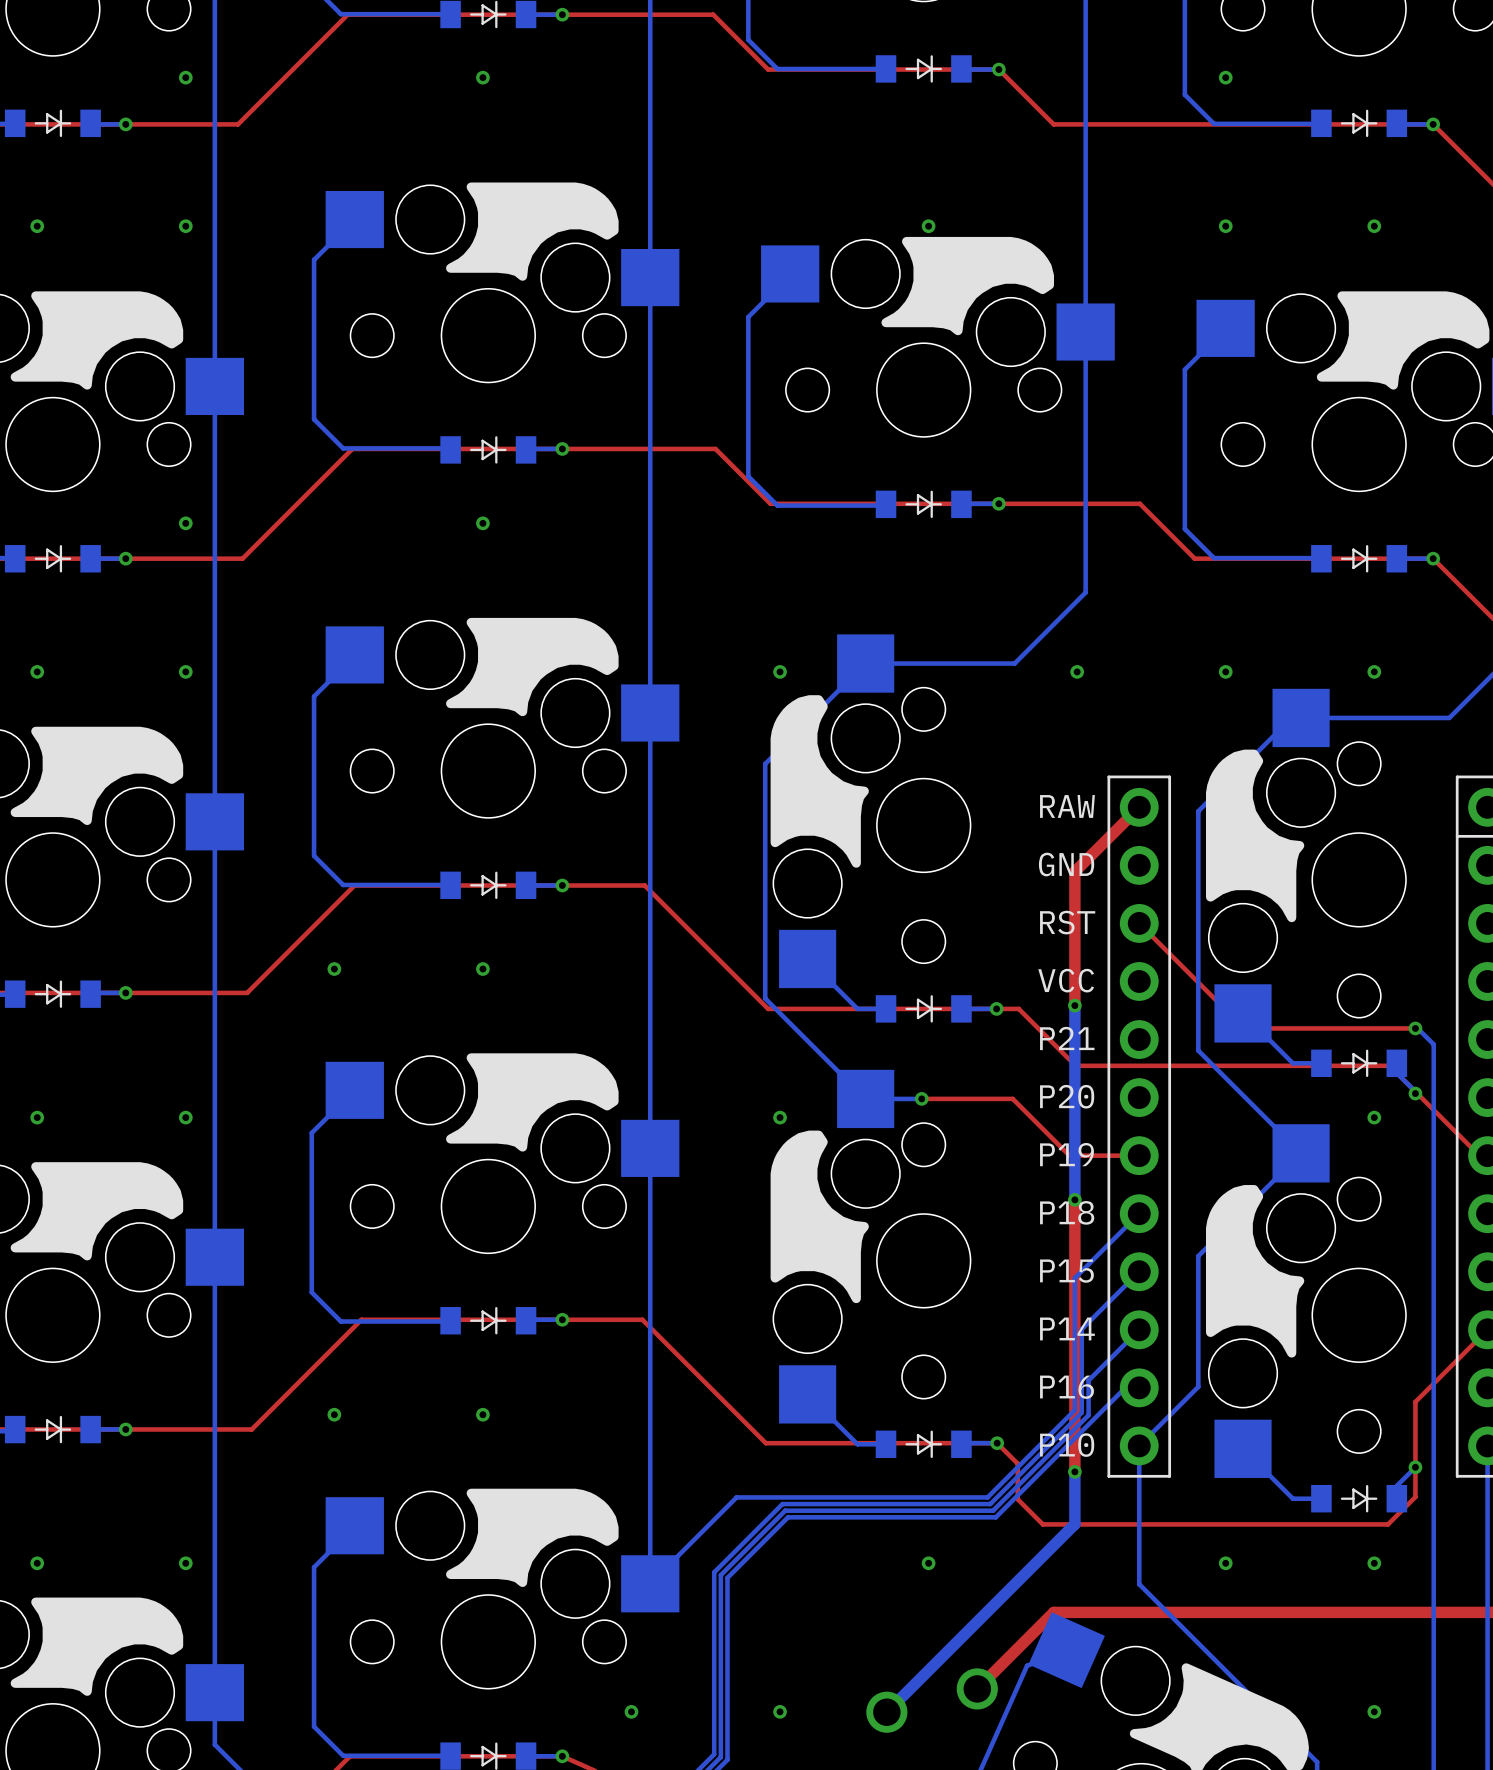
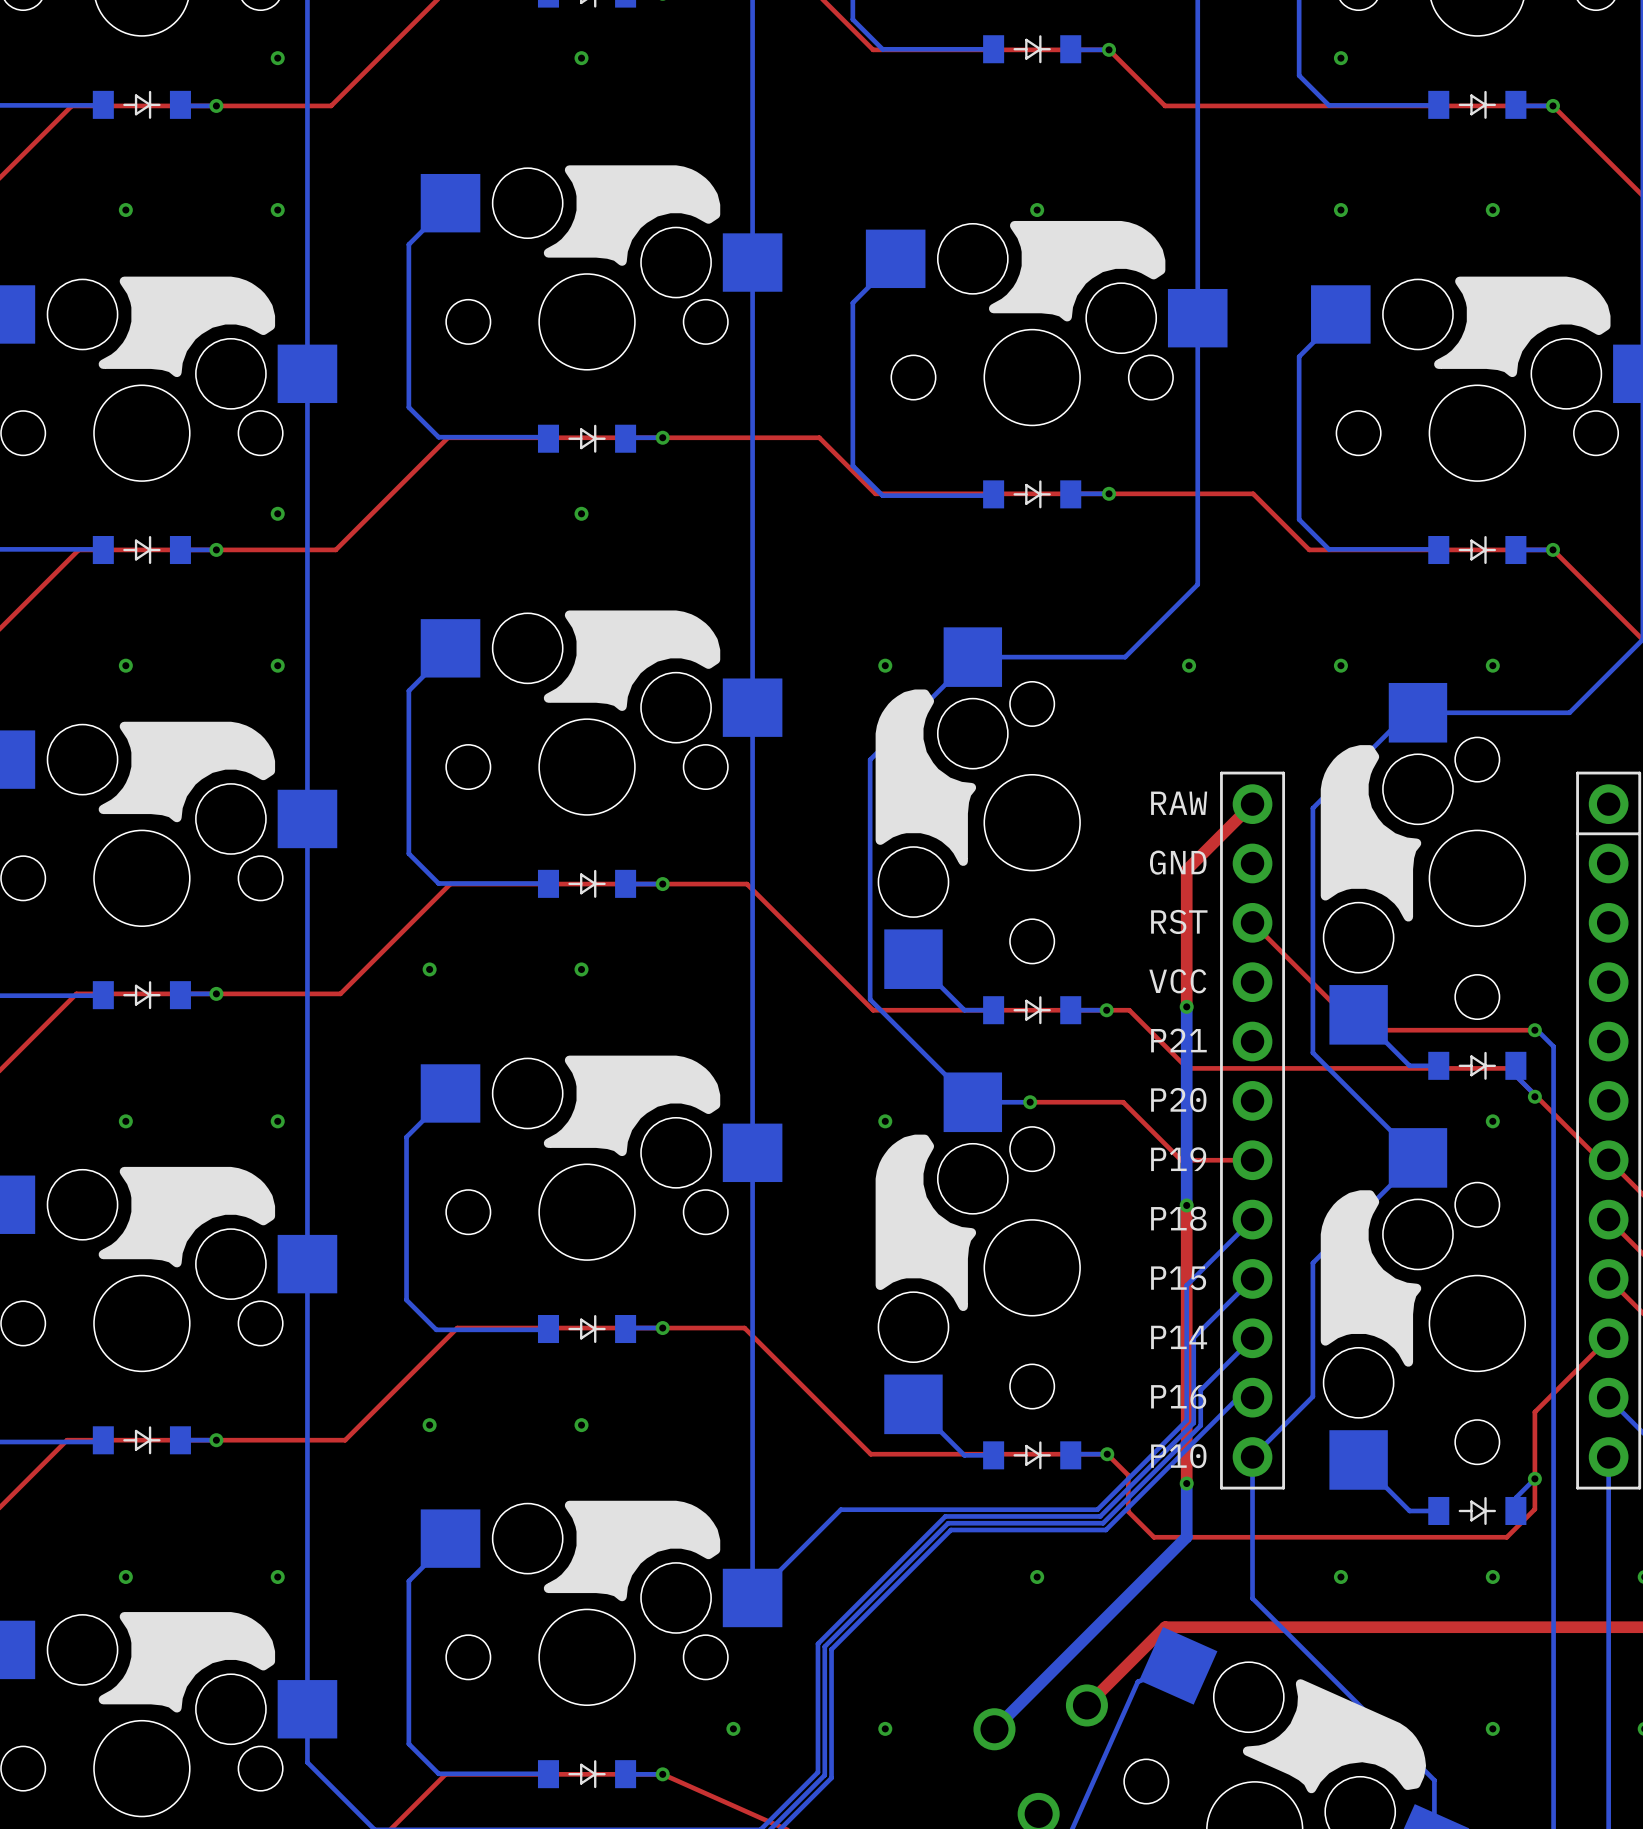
bottom track: (838, 1504) (782, 1504) (714, 1572) (714, 1628) -> (945, 1516) (817, 1643)
bottom track: (841, 1510) (785, 1510) (720, 1575) (720, 1631) -> (948, 1523) (824, 1646)
bottom track: (844, 1517) (788, 1517) (727, 1577) (727, 1634) -> (950, 1530) (831, 1649)

